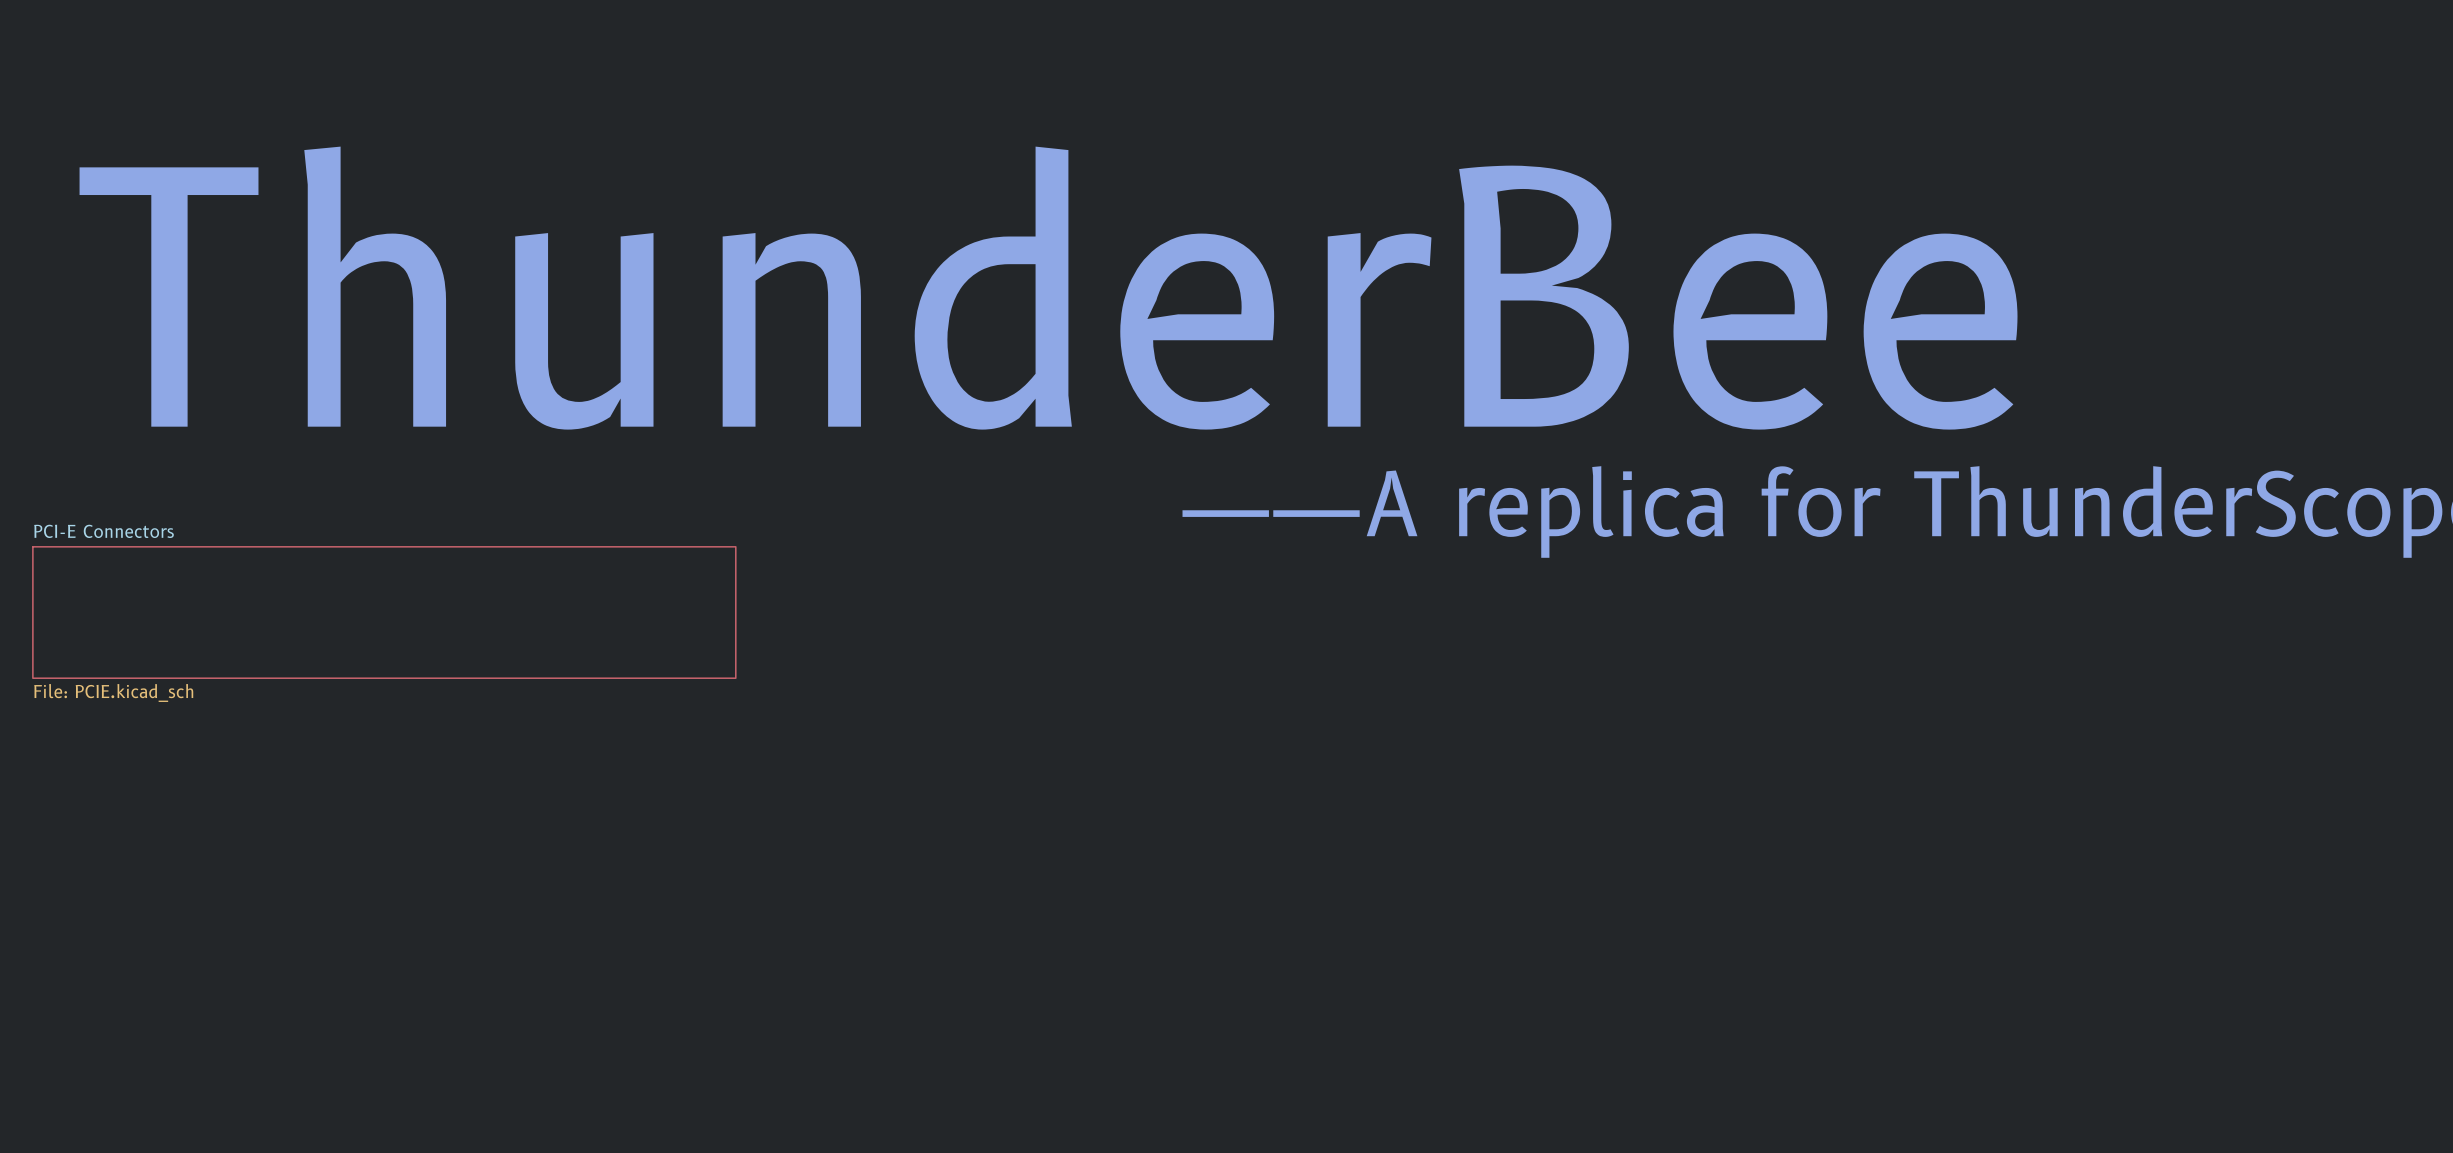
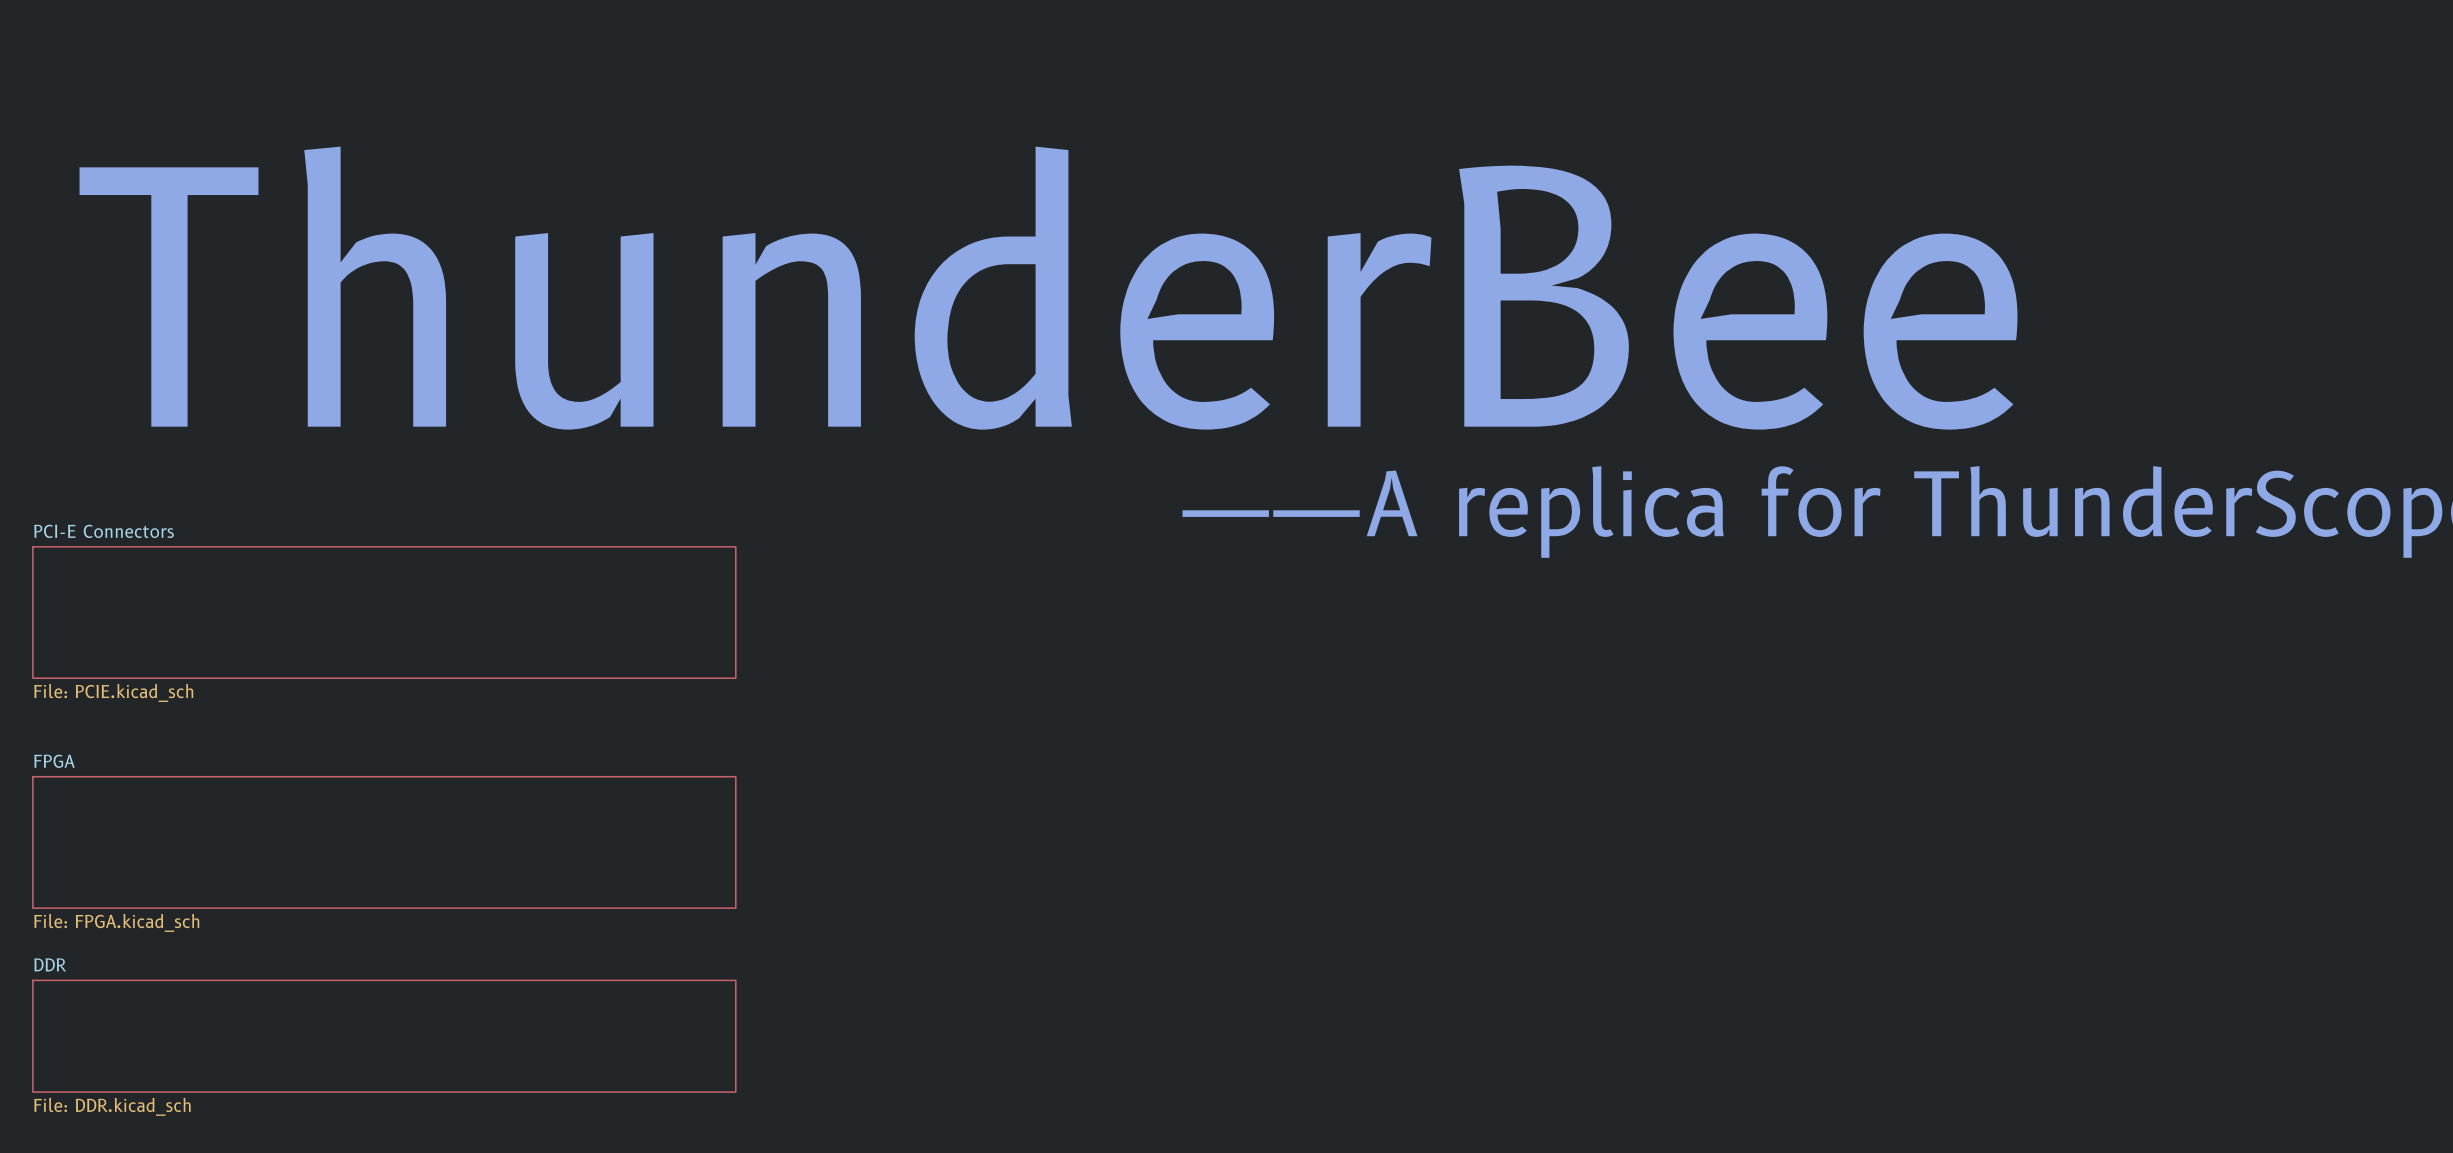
sheet FPGA: none -> File: FPGA.kicad_sch (384, 842)
sheet DDR: none -> File: DDR.kicad_sch (384, 1036)

